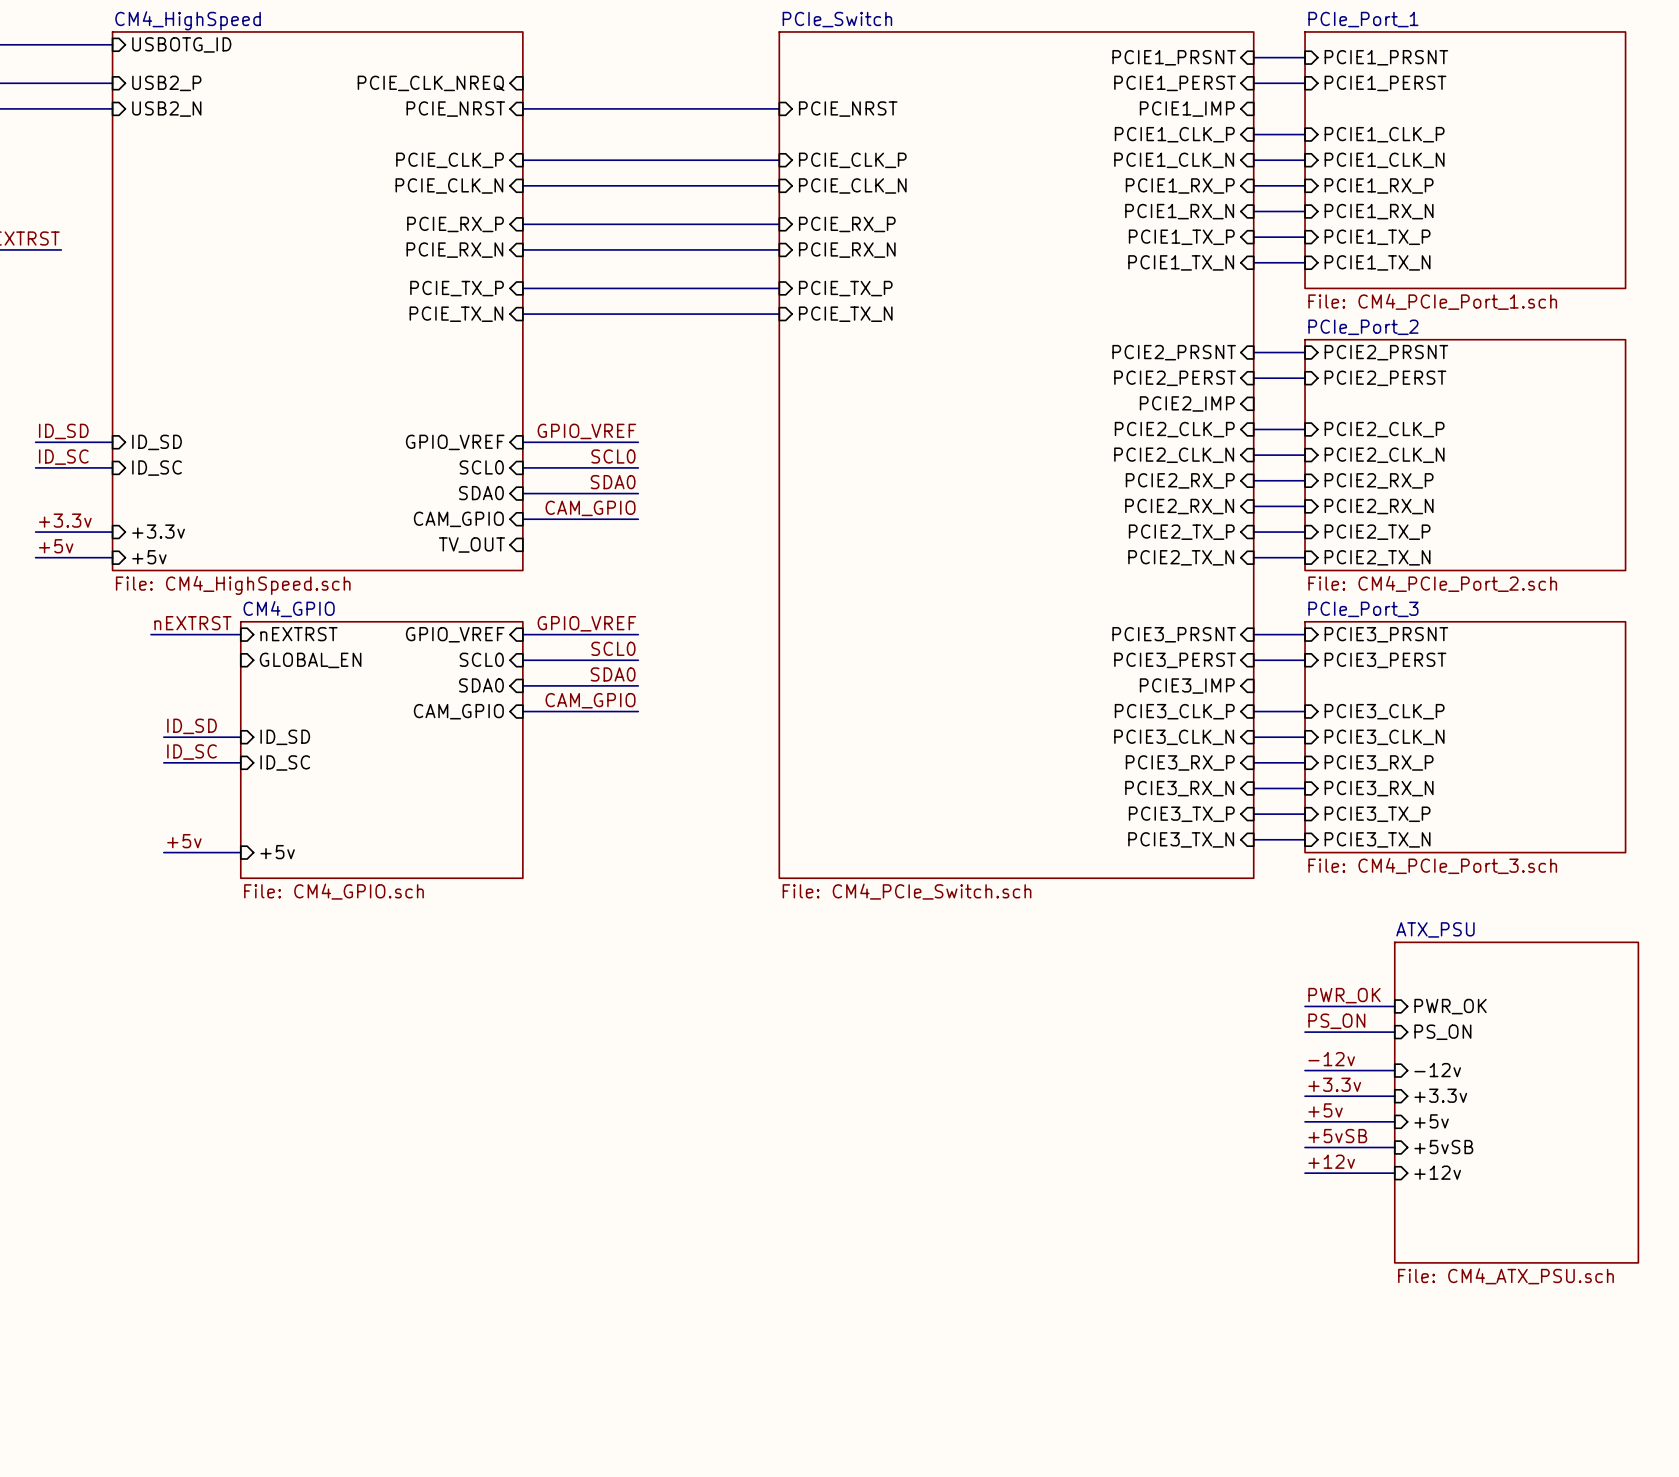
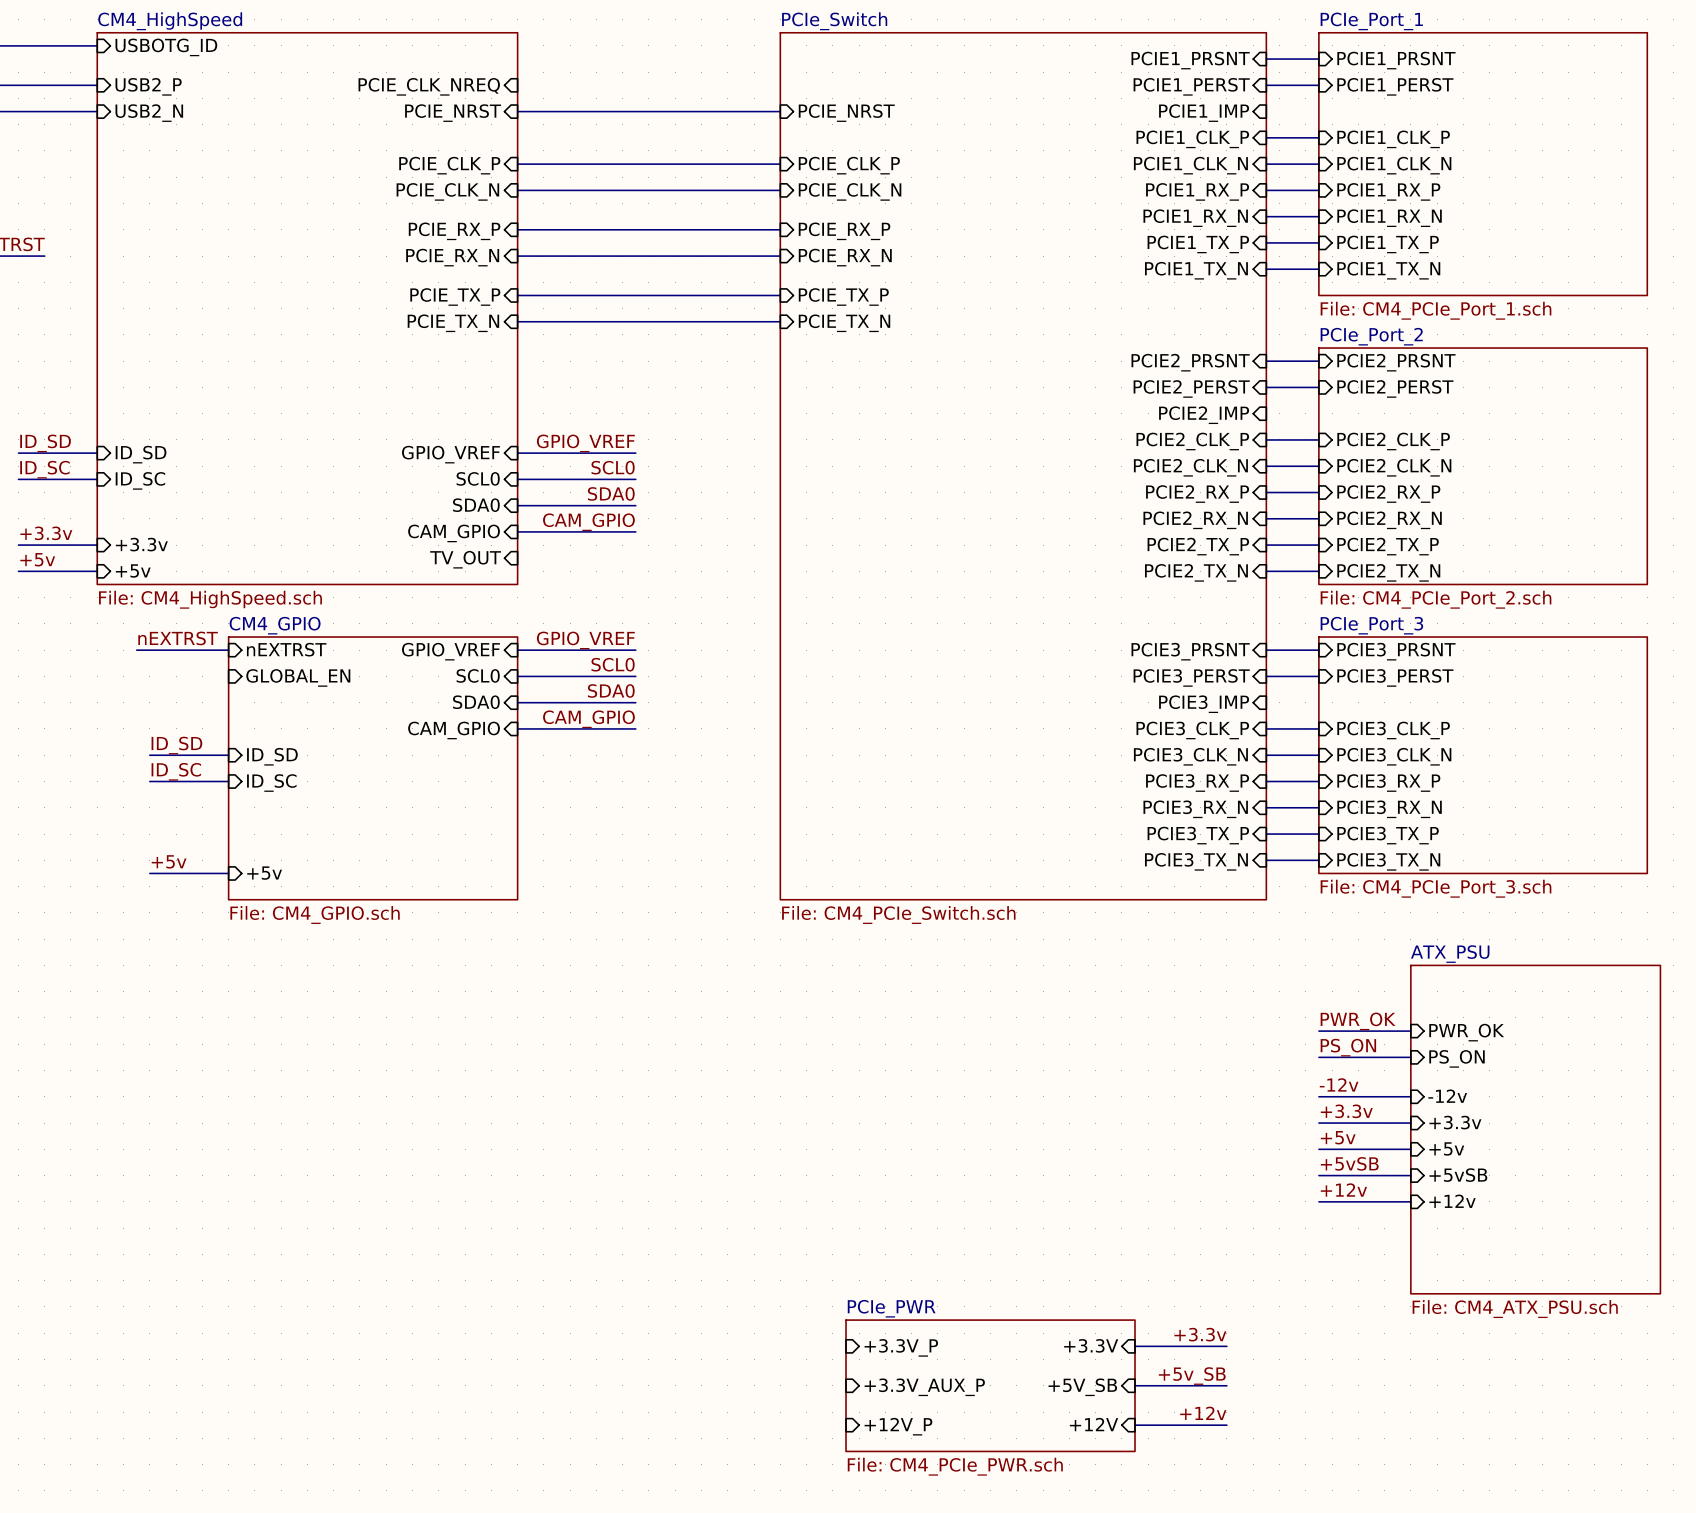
label: none -> +3.3v (1200, 1334)
sheet pin: none -> +3.3V (1091, 1345)
sheet pin: none -> +3.3V_P (901, 1347)
wire: none -> (1134, 1346) (1226, 1346)
label: none -> +5v_SB (1192, 1376)
sheet pin: none -> +3.3V_AUX_P (924, 1387)
sheet PCIe_PWR: none -> File: CM4_PCIe_PWR.sch (990, 1385)
sheet pin: none -> +5V_SB (1082, 1387)
wire: none -> (1134, 1385) (1226, 1385)
label: none -> +12v (1203, 1413)
sheet pin: none -> +12V (1094, 1424)
sheet pin: none -> +12V_P (898, 1426)
wire: none -> (1134, 1425) (1226, 1425)

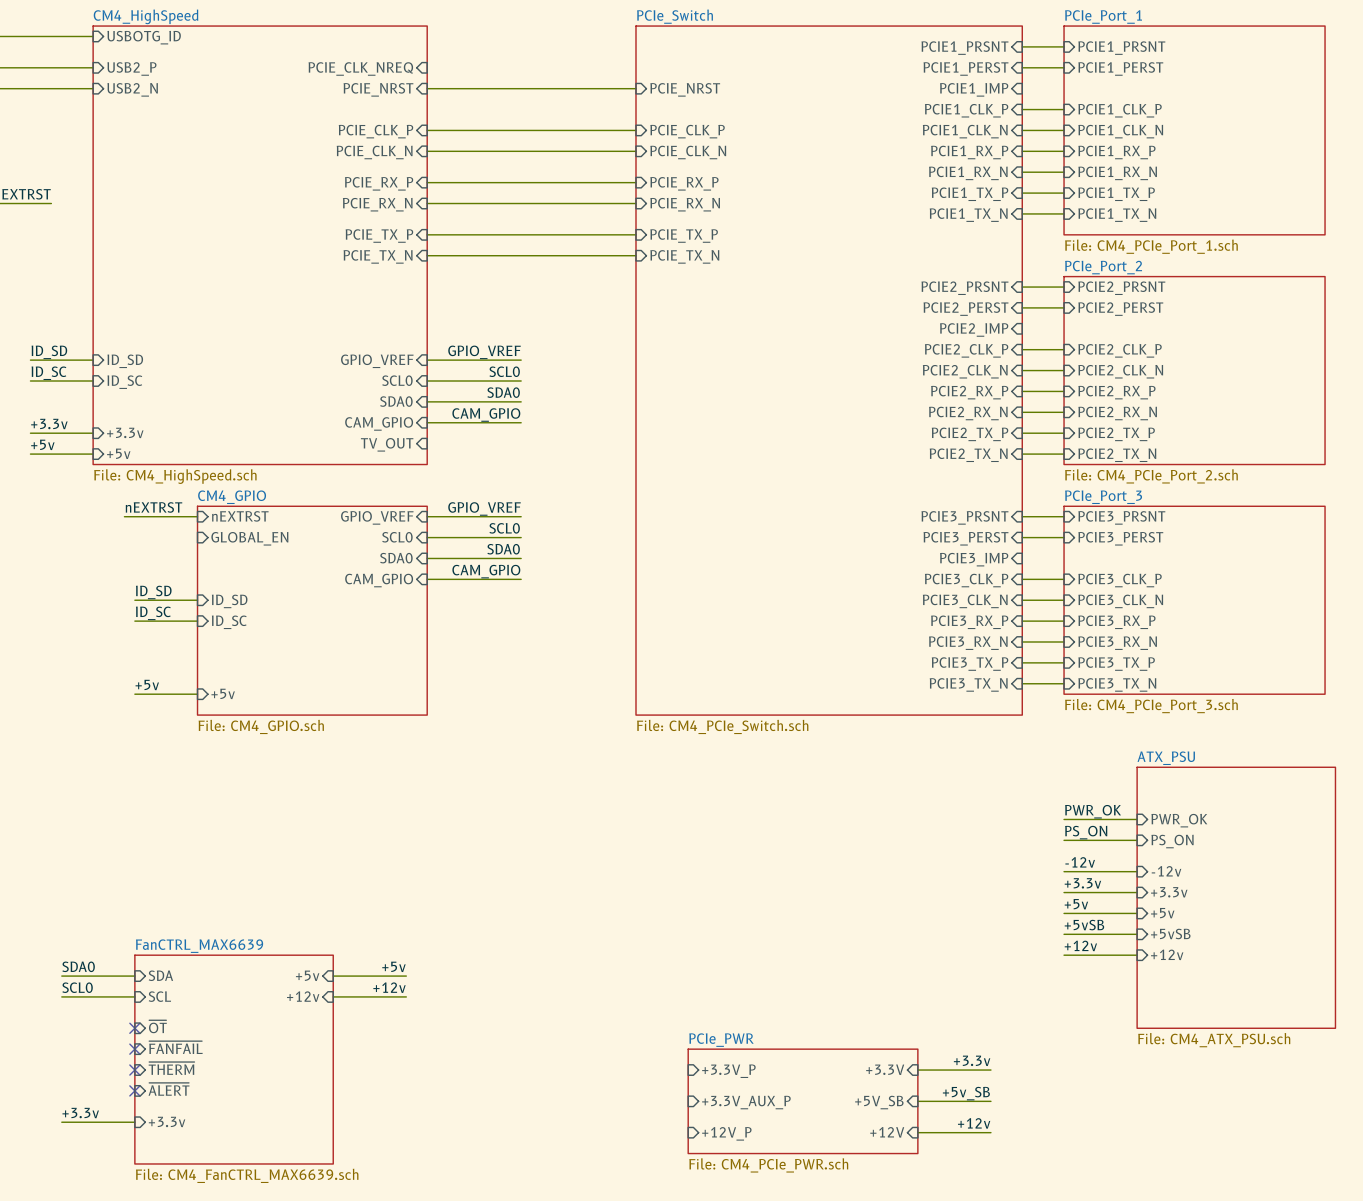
label: none -> SDA0 (78, 966)
label: none -> +5v (393, 966)
sheet pin: none -> SDA (160, 975)
sheet pin: none -> +5v (307, 975)
wire: none -> (61, 976) (134, 976)
wire: none -> (333, 976) (406, 976)
label: none -> SCL0 (77, 987)
label: none -> +12v (389, 987)
sheet pin: none -> SCL (159, 996)
sheet pin: none -> +12v (303, 996)
wire: none -> (61, 996) (134, 996)
wire: none -> (333, 996) (406, 996)
sheet pin: none -> ~{OT} (157, 1026)
no-connect mark: none -> (134, 1028)
sheet pin: none -> ~{FANFAIL} (175, 1047)
no-connect mark: none -> (134, 1049)
sheet FanCTRL_MAX6639: none -> File: CM4_FanCTRL_MAX6639.sch (234, 1059)
sheet pin: none -> ~{THERM} (171, 1068)
no-connect mark: none -> (134, 1070)
sheet pin: none -> ~{ALERT} (169, 1089)
no-connect mark: none -> (134, 1090)
label: none -> +3.3v (80, 1113)
sheet pin: none -> +3.3v (167, 1121)
wire: none -> (61, 1122) (134, 1122)

